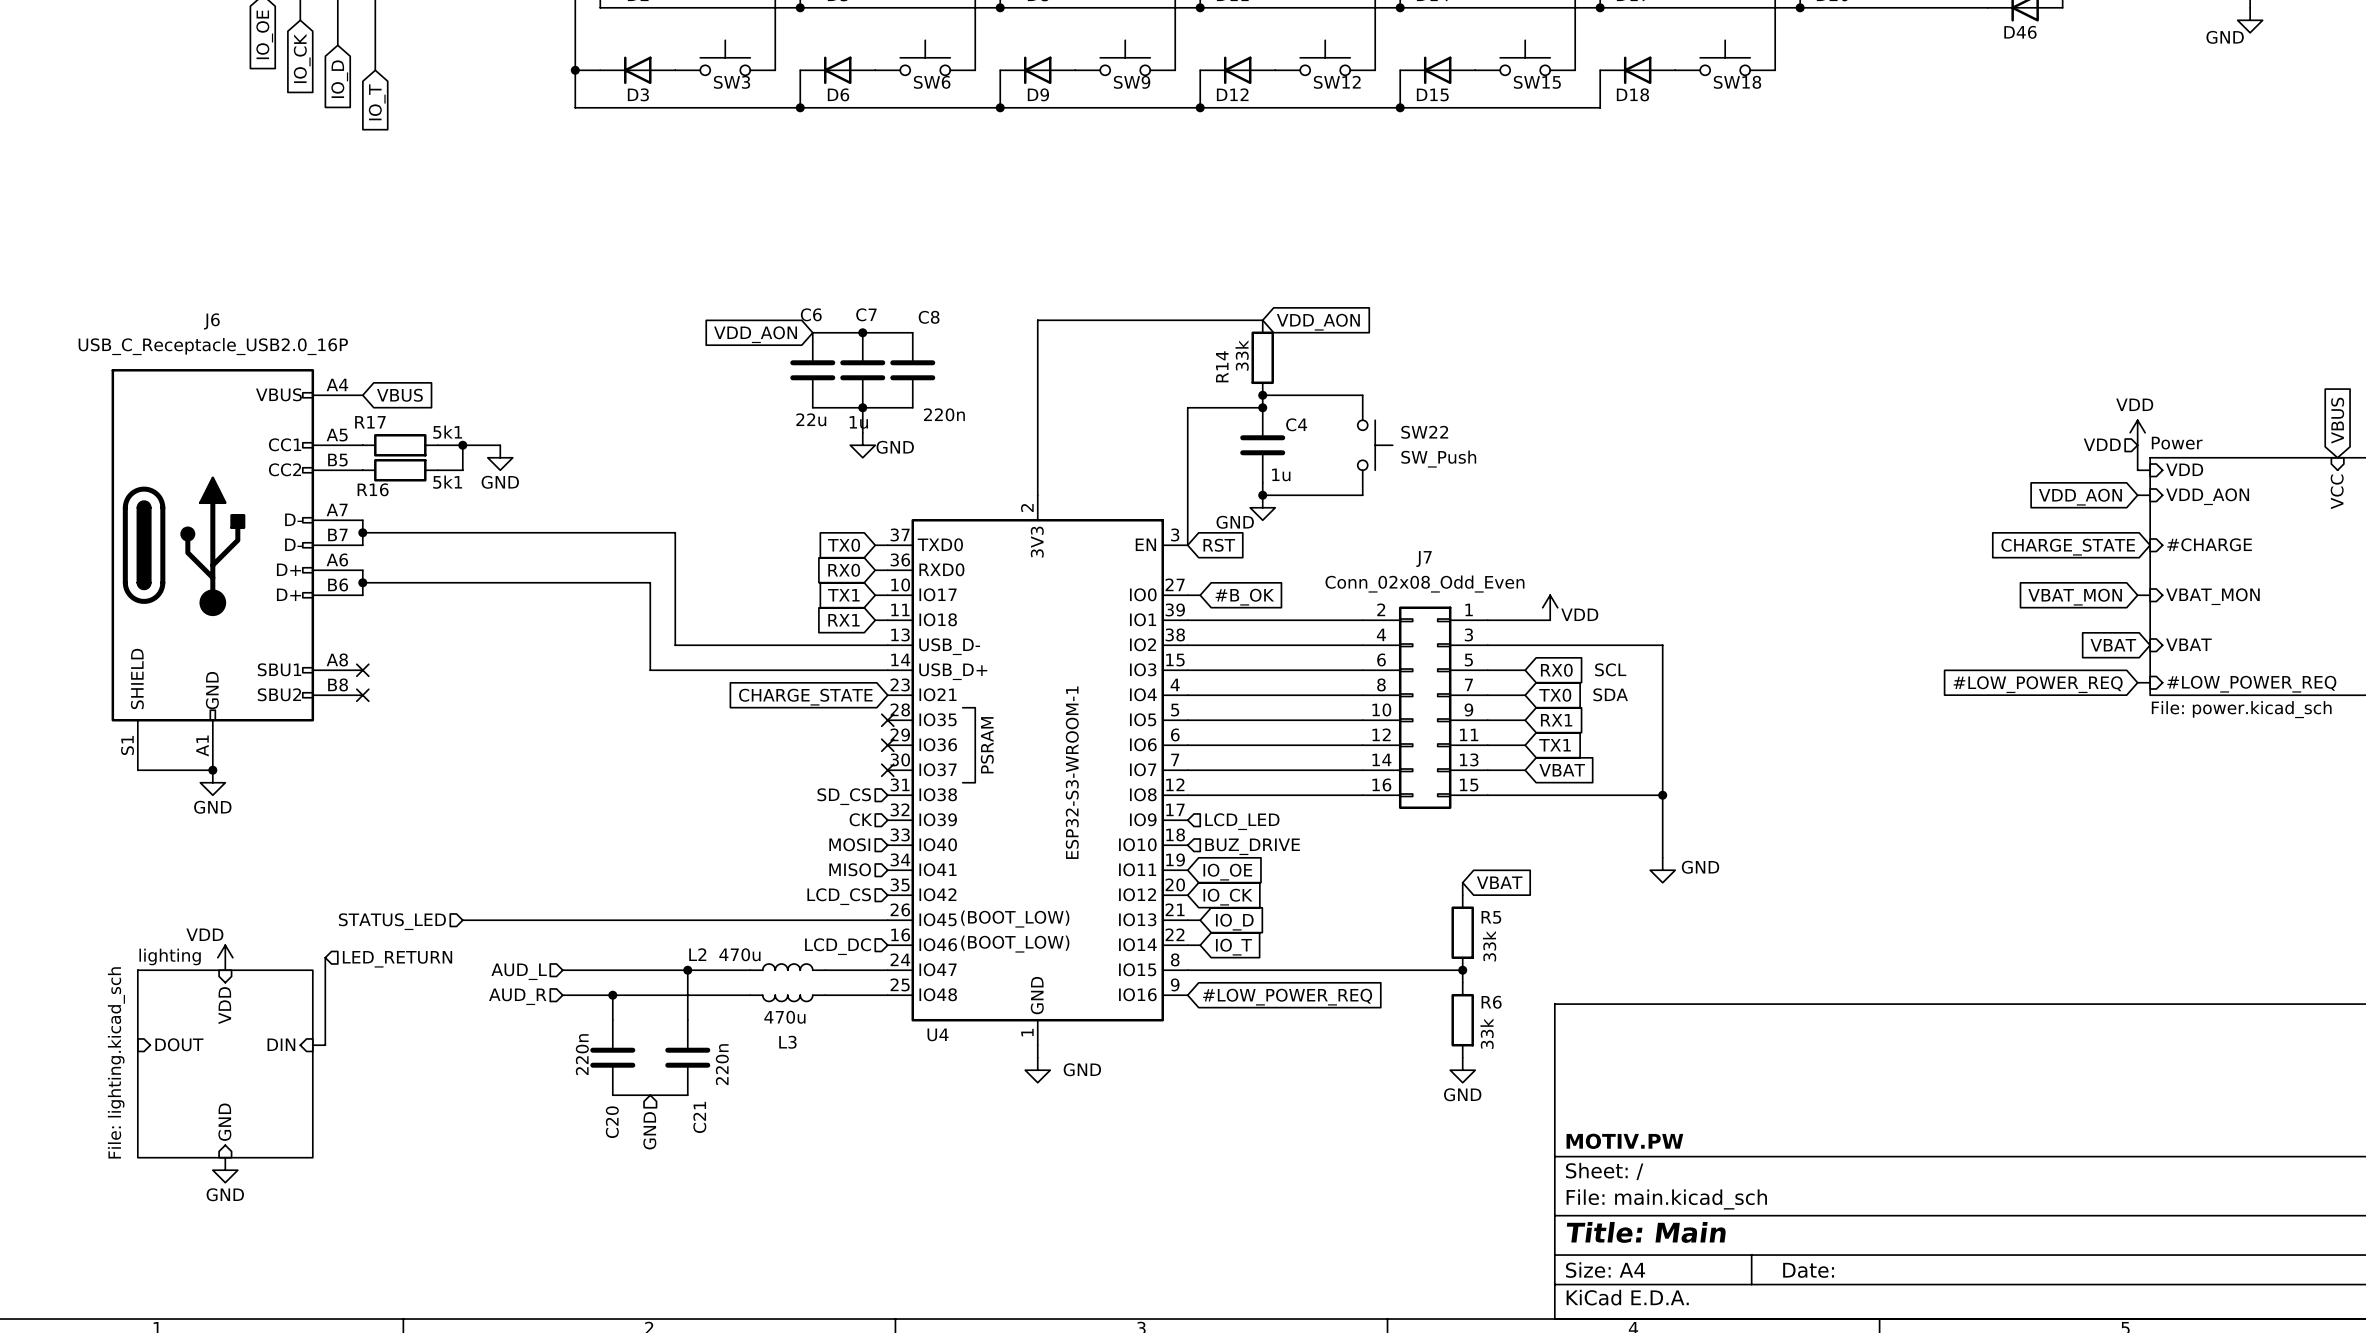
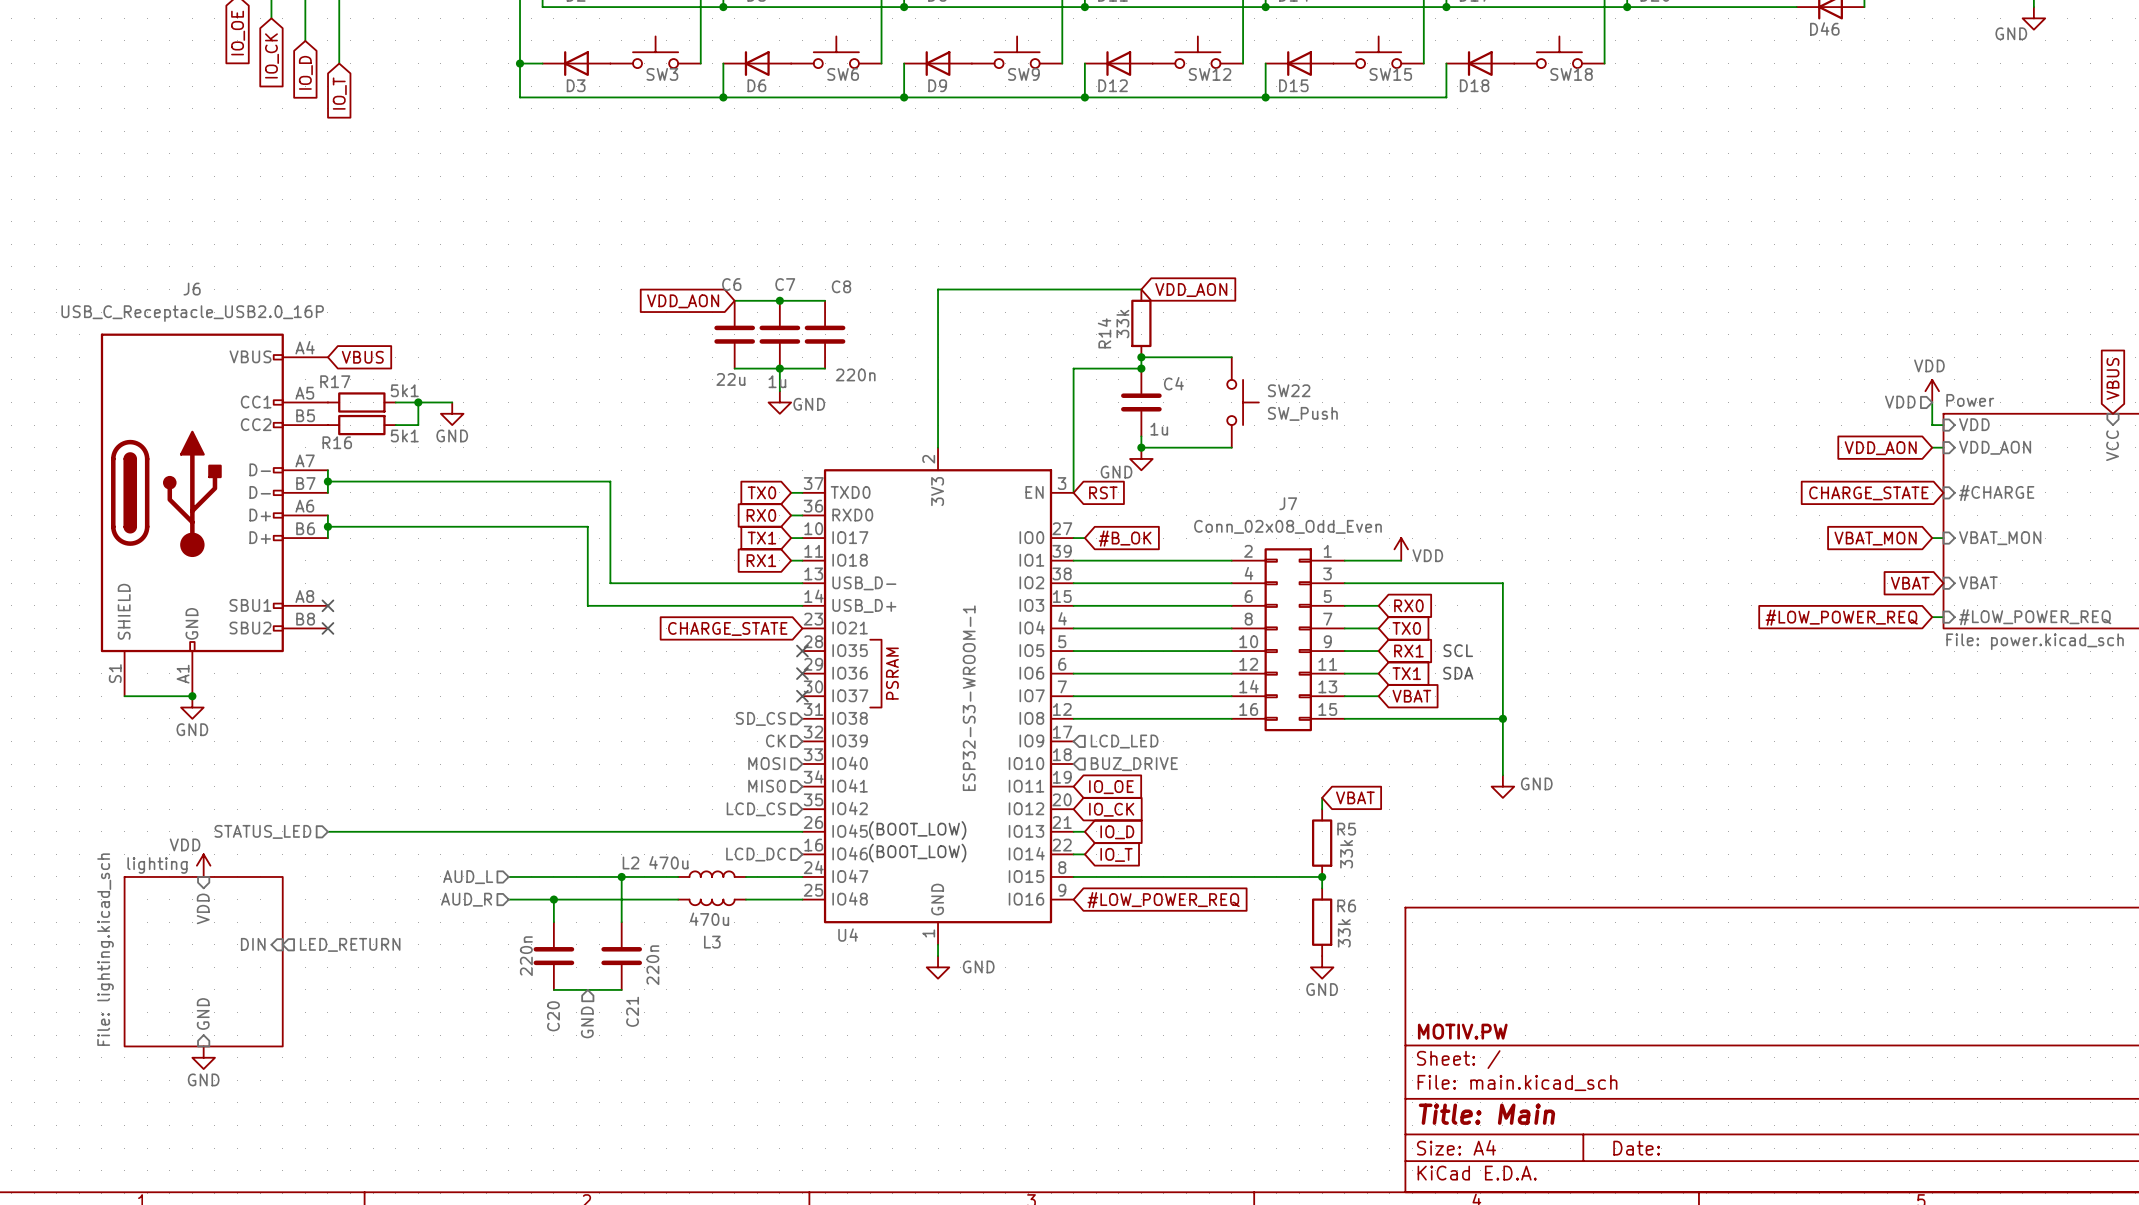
text position: SCL (1610, 669) -> SCL (1458, 650)
text position: SDA (1610, 694) -> SDA (1458, 673)
wire: none -> (327, 831) (418, 831)
hierarchical label position: STATUS_LED (392, 921) -> STATUS_LED (262, 831)
wire: (325, 957) (325, 1045) (312, 1045) -> none
hierarchical label position: LED_RETURN (397, 959) -> LED_RETURN (350, 944)
sheet pin: DOUT (179, 1044) -> none

